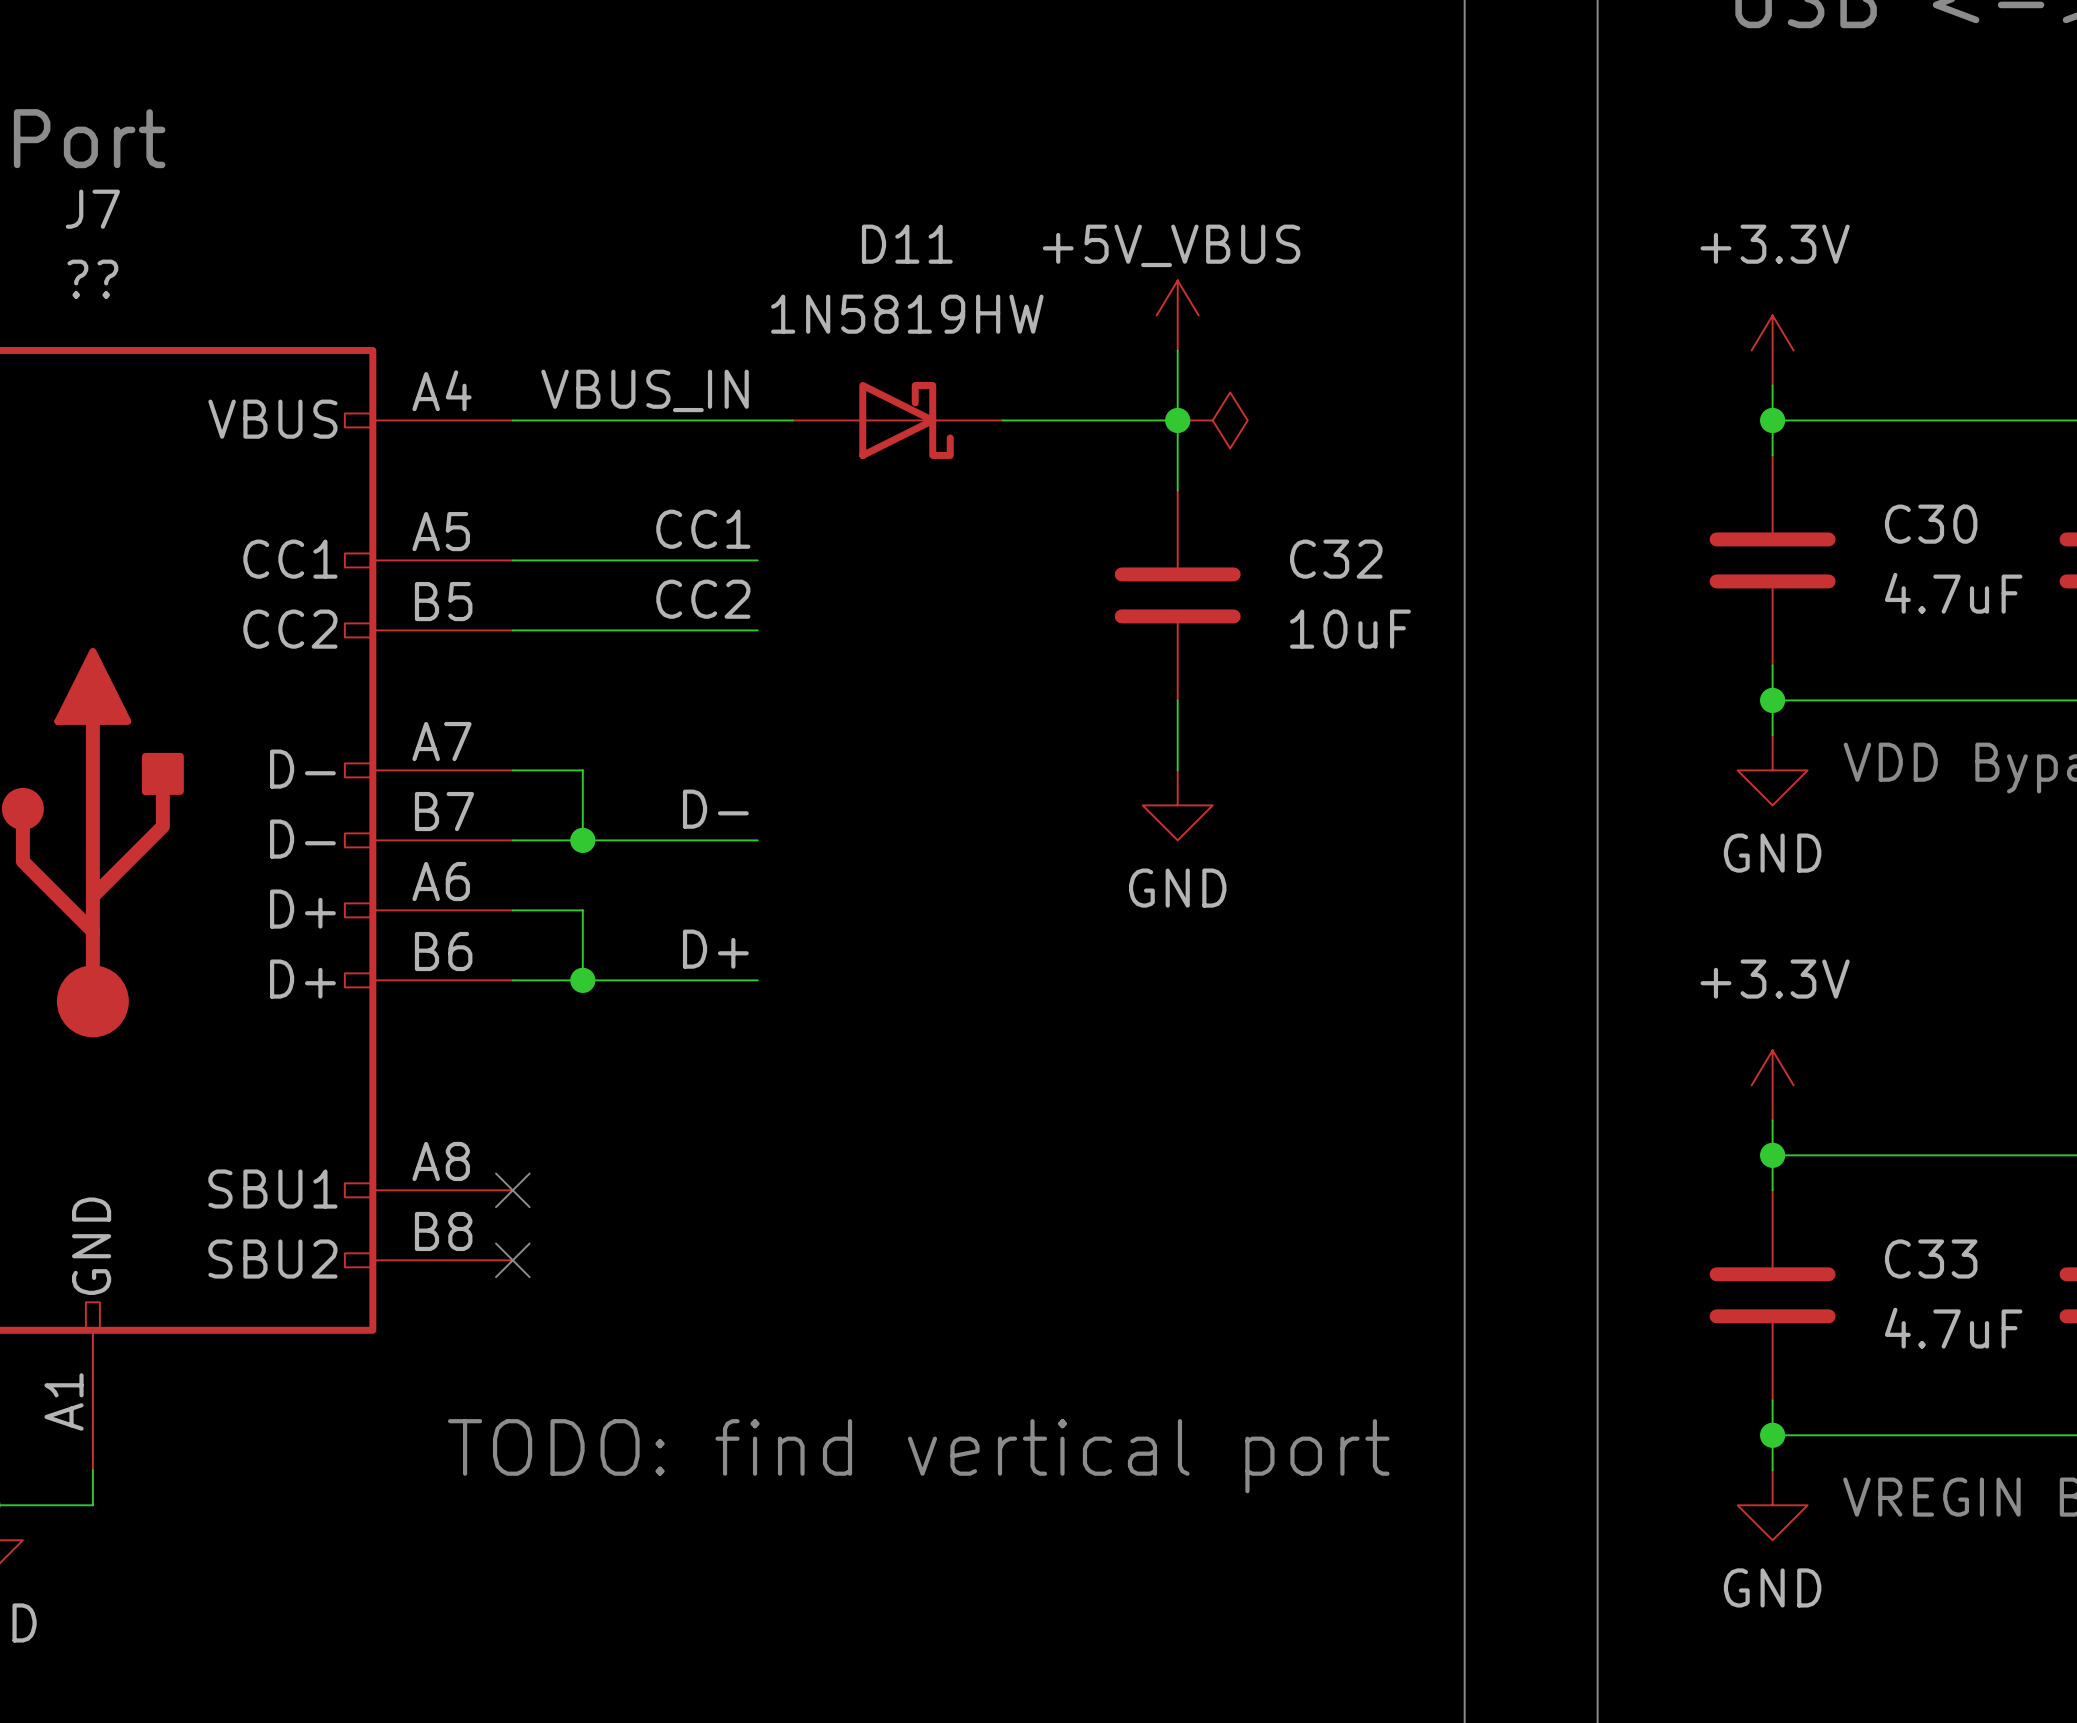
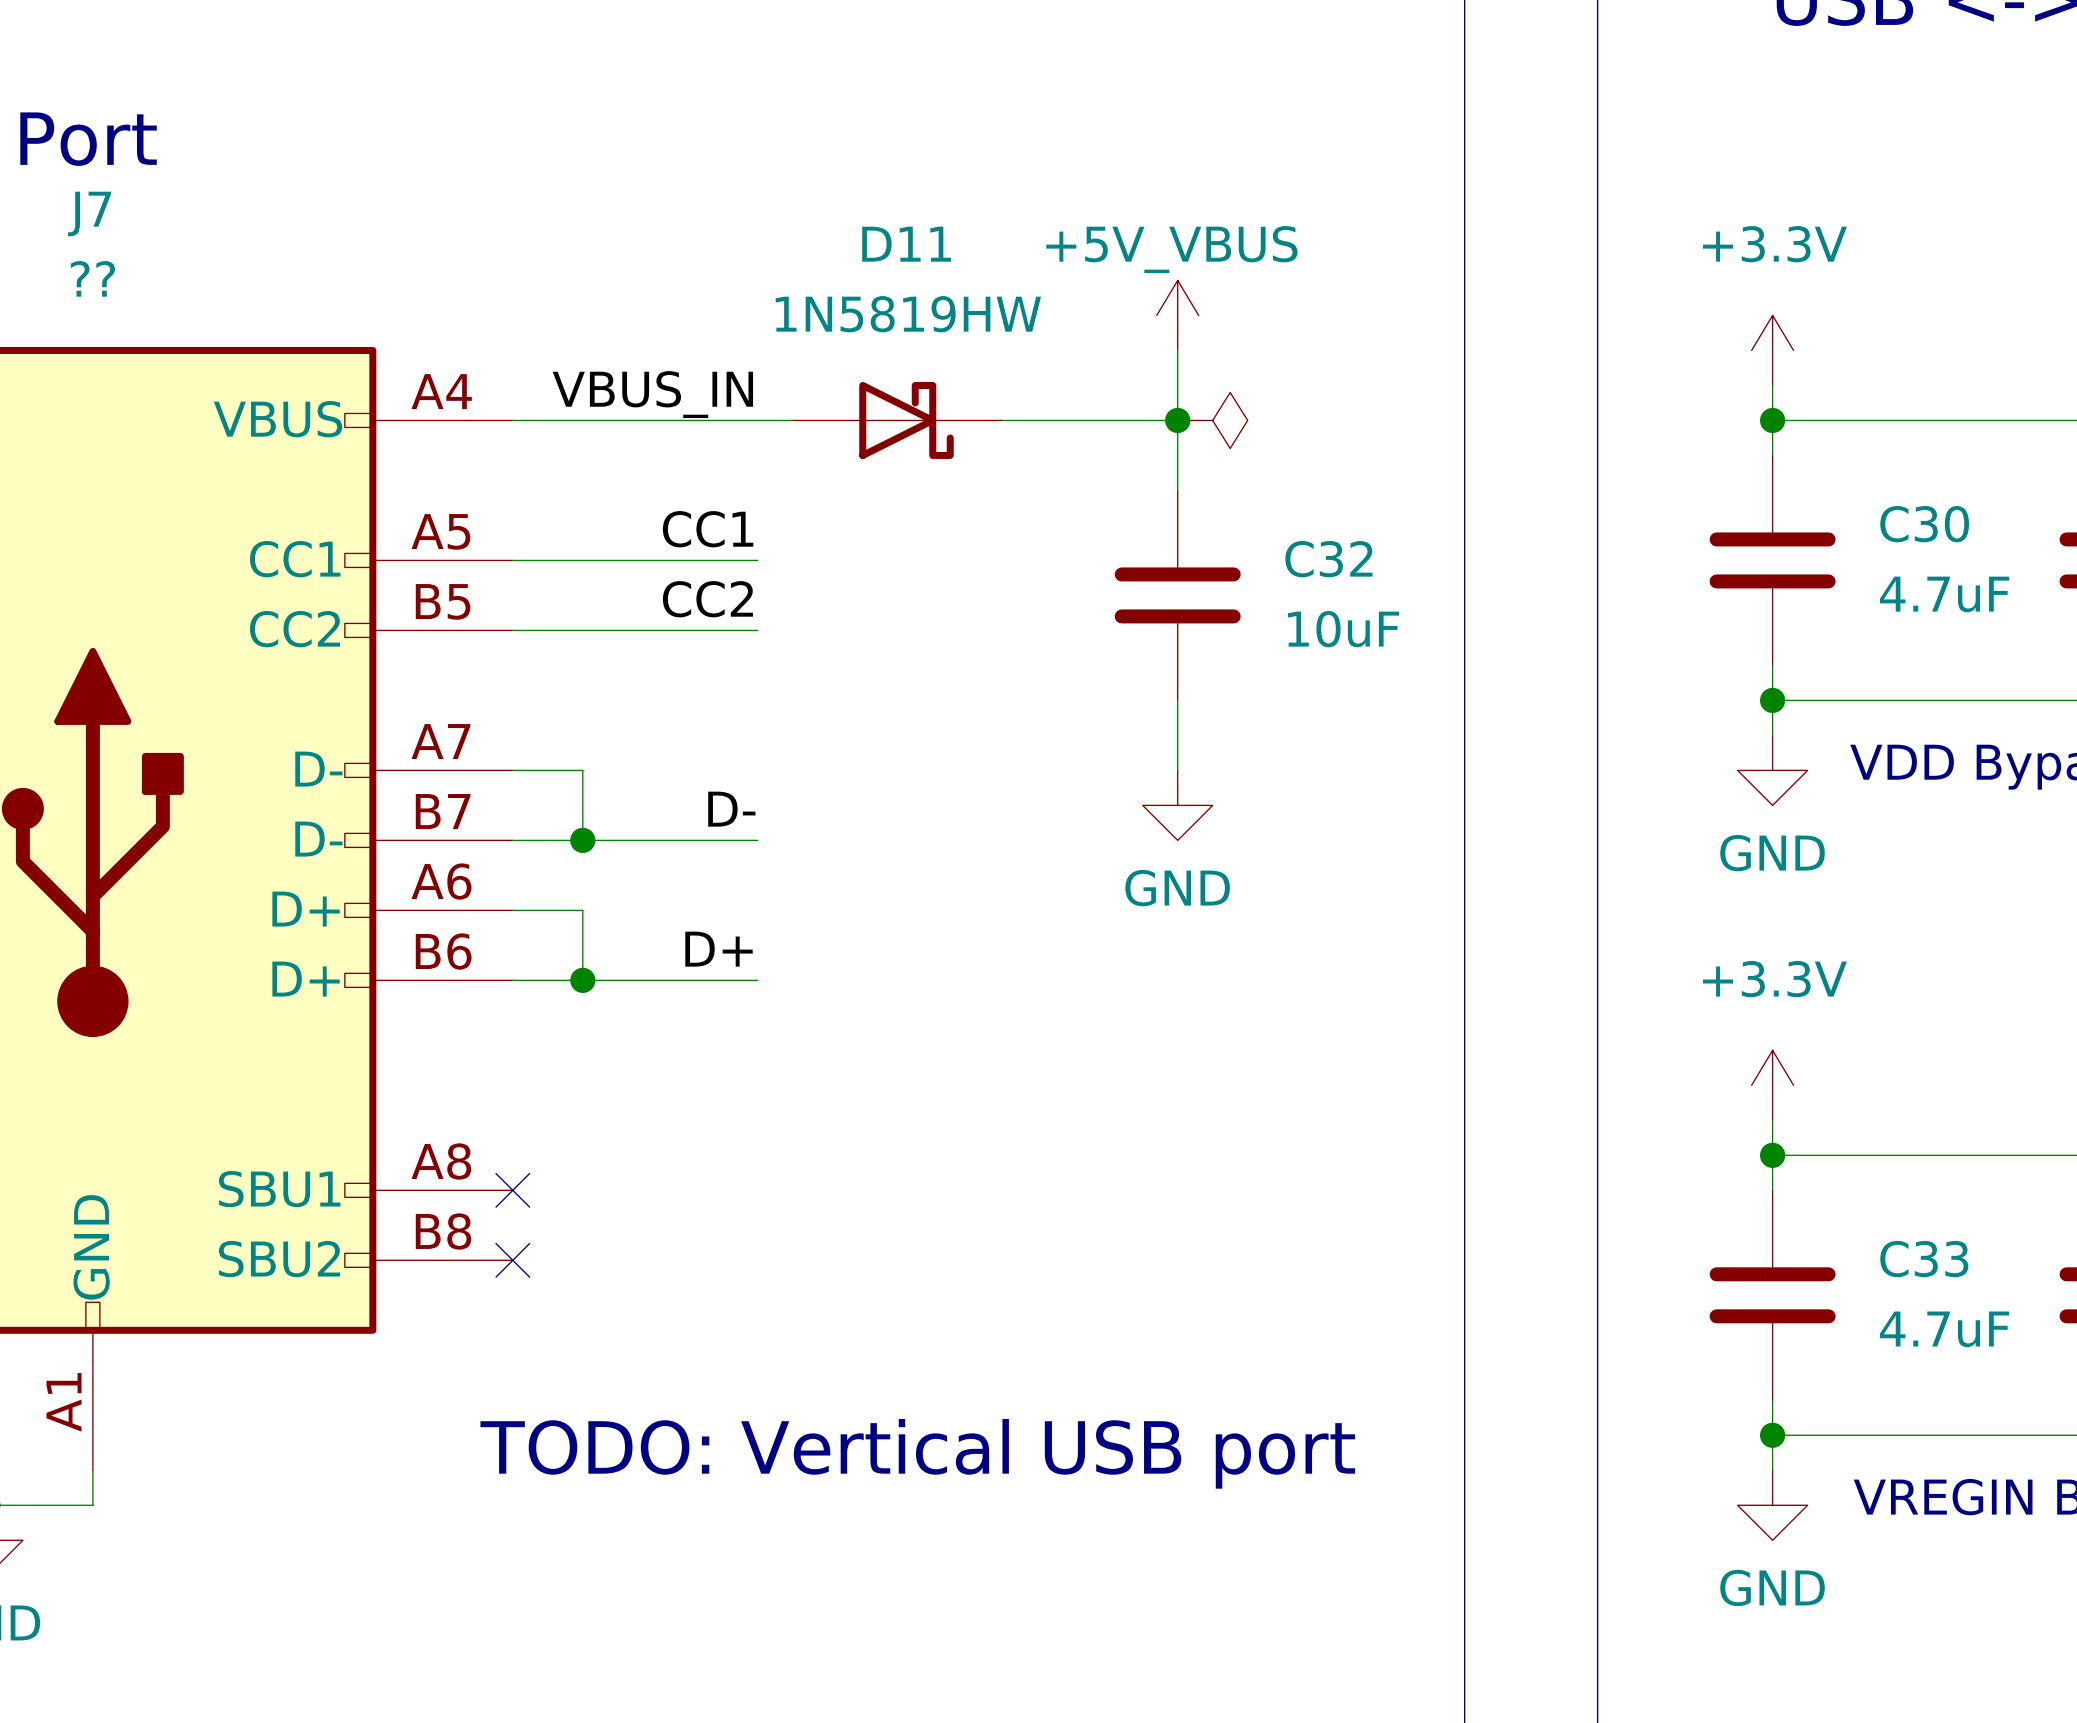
text: TODO: find vertical port (918, 1456) -> TODO: Vertical USB port (917, 1453)

